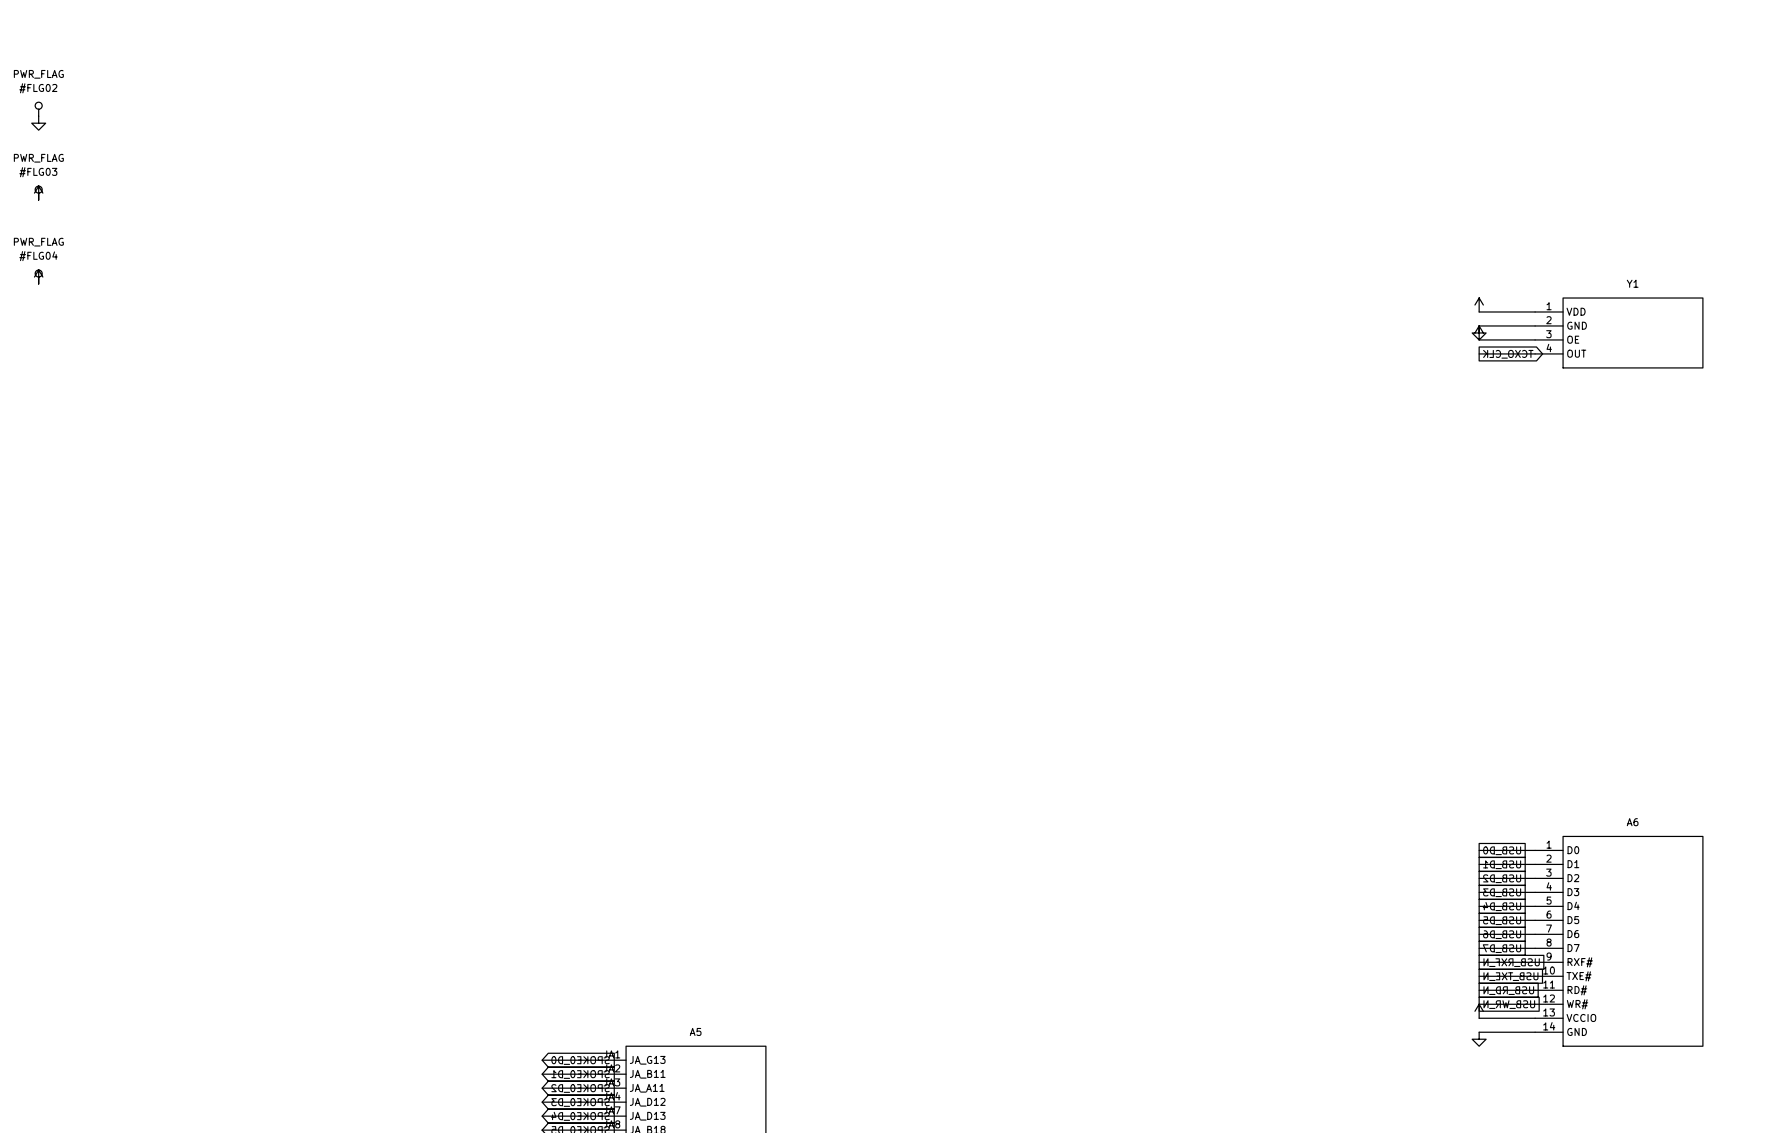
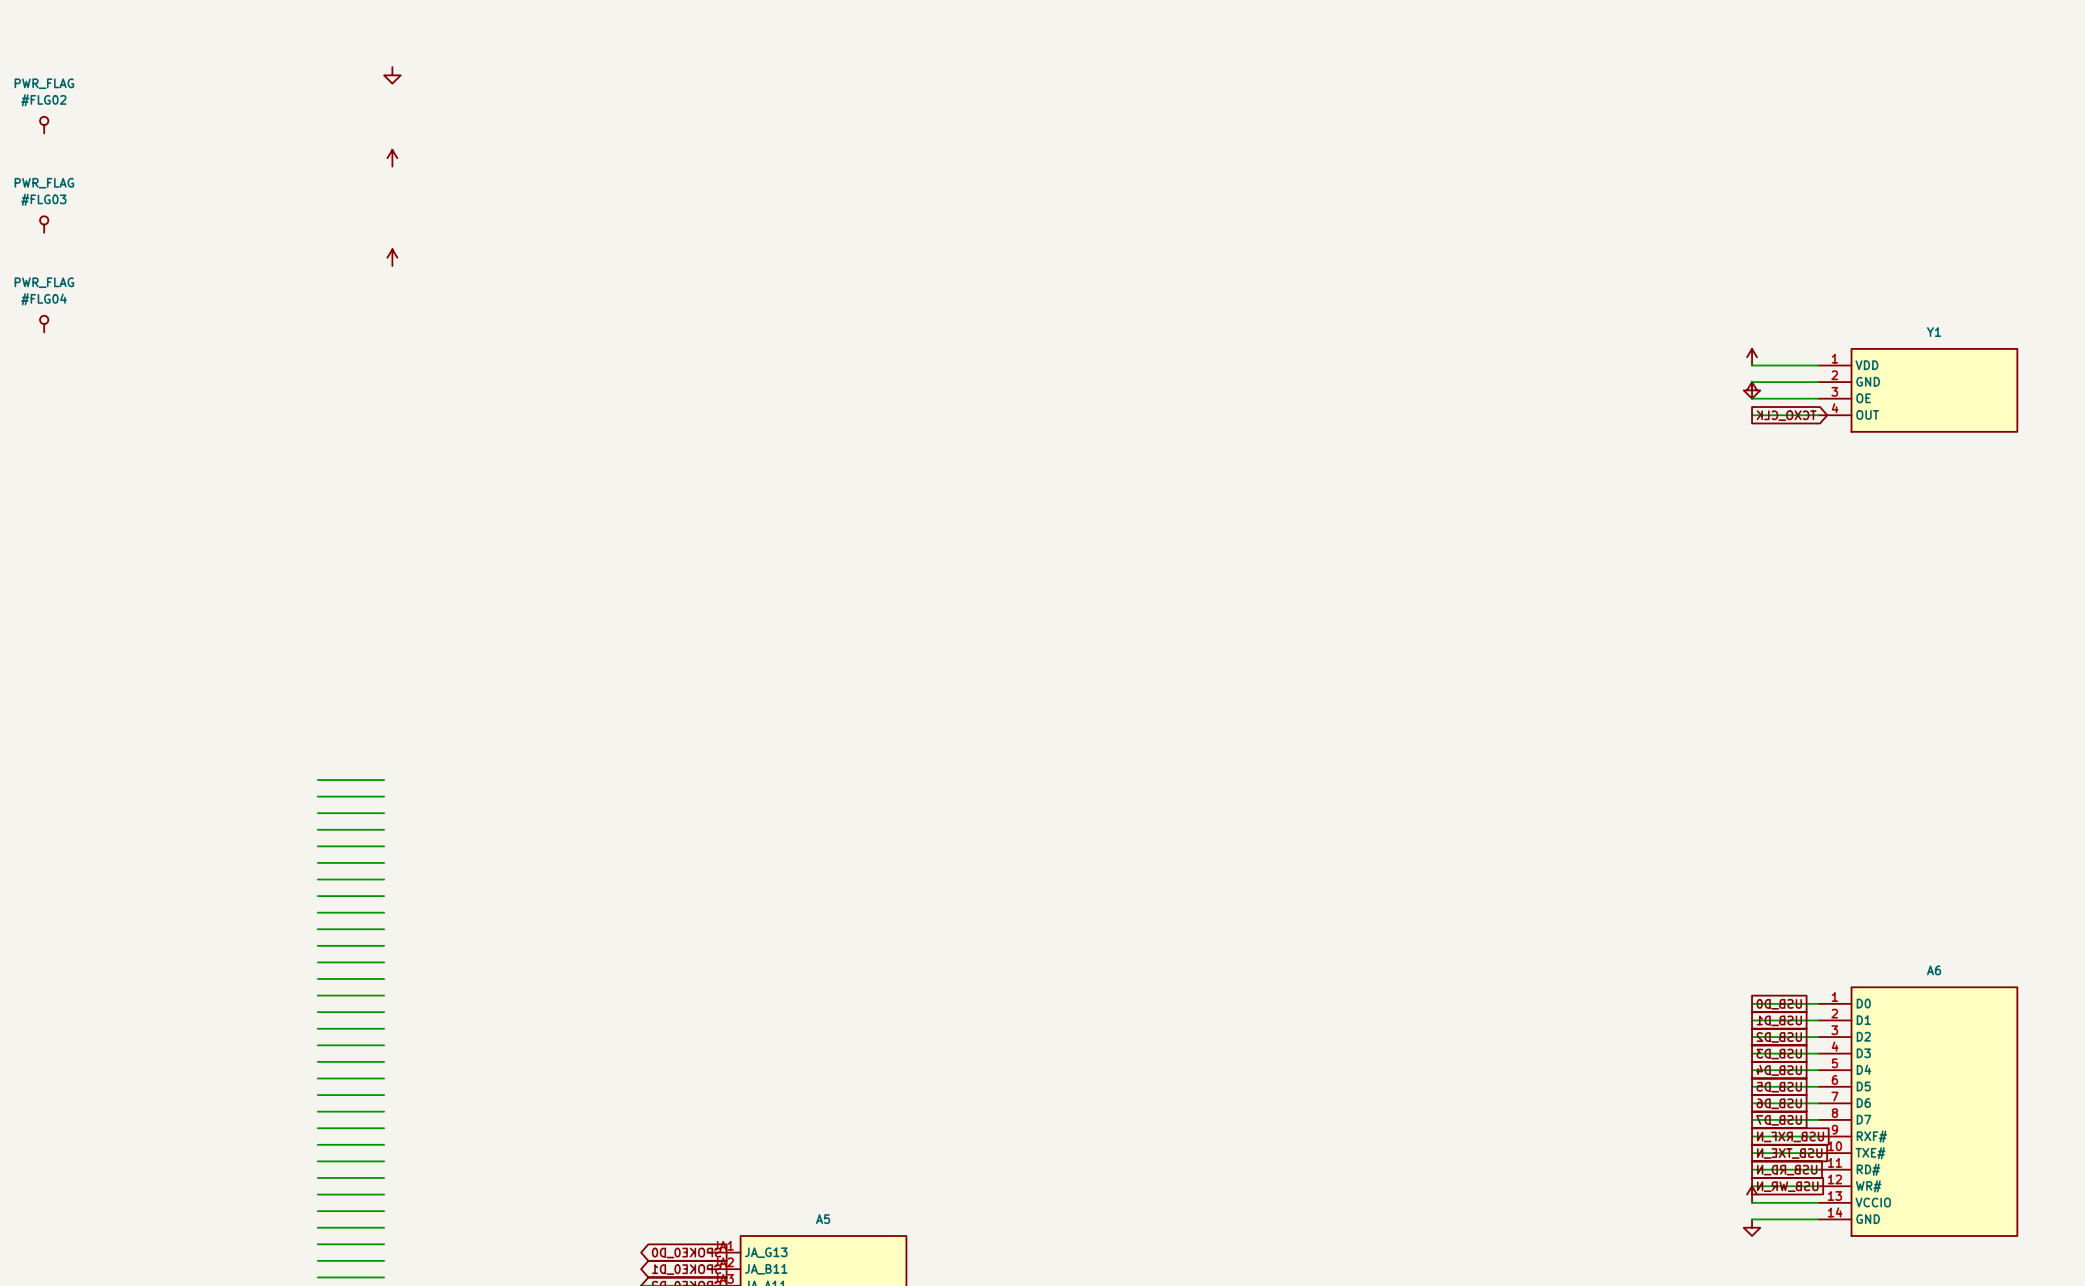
power symbol: none -> (392, 75)
power symbol: (38, 123) -> none
power symbol: none -> (392, 158)
power symbol: (38, 193) -> none
power symbol: none -> (392, 257)
power symbol: (38, 277) -> none
wire: none -> (317, 780) (384, 780)
wire: none -> (317, 796) (384, 796)
wire: none -> (317, 813) (384, 813)
wire: none -> (317, 829) (384, 829)
wire: none -> (317, 846) (384, 846)
wire: none -> (317, 862) (384, 862)
wire: none -> (317, 879) (384, 879)
wire: none -> (317, 896) (384, 896)
wire: none -> (317, 912) (384, 912)
wire: none -> (317, 929) (384, 929)
wire: none -> (317, 945) (384, 945)
wire: none -> (317, 962) (384, 962)
wire: none -> (317, 979) (384, 979)
wire: none -> (317, 995) (384, 995)
wire: none -> (317, 1012) (384, 1012)
wire: none -> (317, 1028) (384, 1028)
wire: none -> (317, 1045) (384, 1045)
wire: none -> (317, 1061) (384, 1061)
wire: none -> (317, 1078) (384, 1078)
wire: none -> (317, 1095) (384, 1095)
wire: none -> (317, 1111) (384, 1111)
wire: none -> (317, 1128) (384, 1128)
wire: none -> (317, 1144) (384, 1144)
wire: none -> (317, 1161) (384, 1161)
wire: none -> (317, 1177) (384, 1177)
wire: none -> (317, 1194) (384, 1194)
wire: none -> (317, 1211) (384, 1211)
wire: none -> (317, 1227) (384, 1227)
wire: none -> (317, 1244) (384, 1244)
wire: (542, 1060) (598, 1060) -> none
wire: none -> (317, 1260) (384, 1260)
wire: (542, 1074) (598, 1074) -> none
wire: none -> (317, 1277) (384, 1277)

